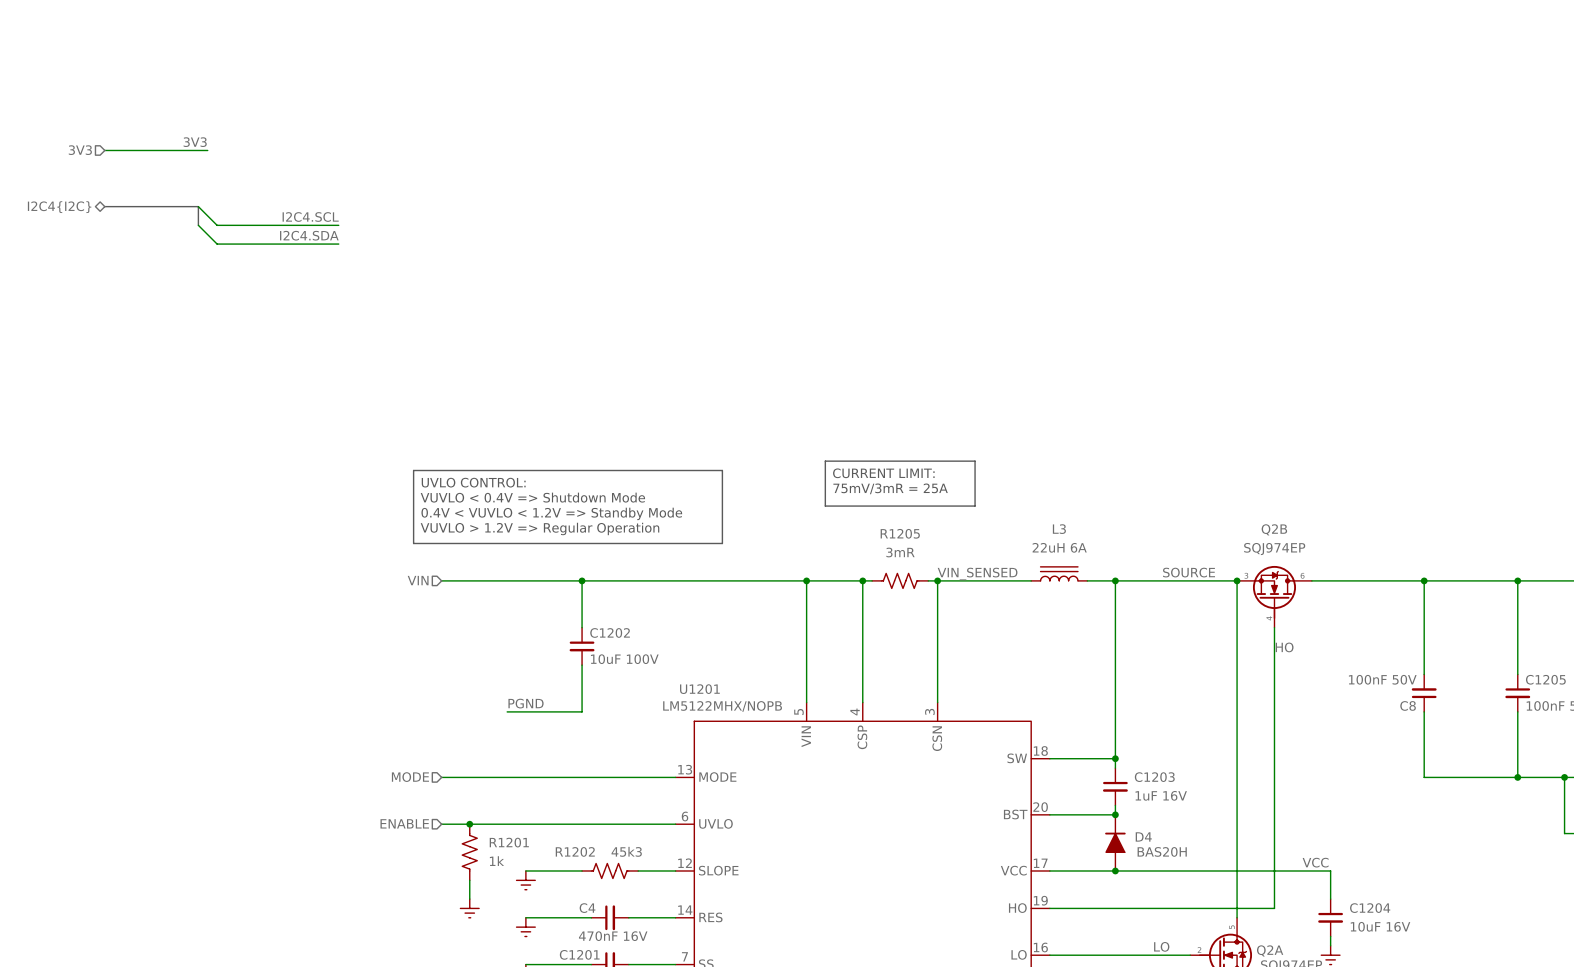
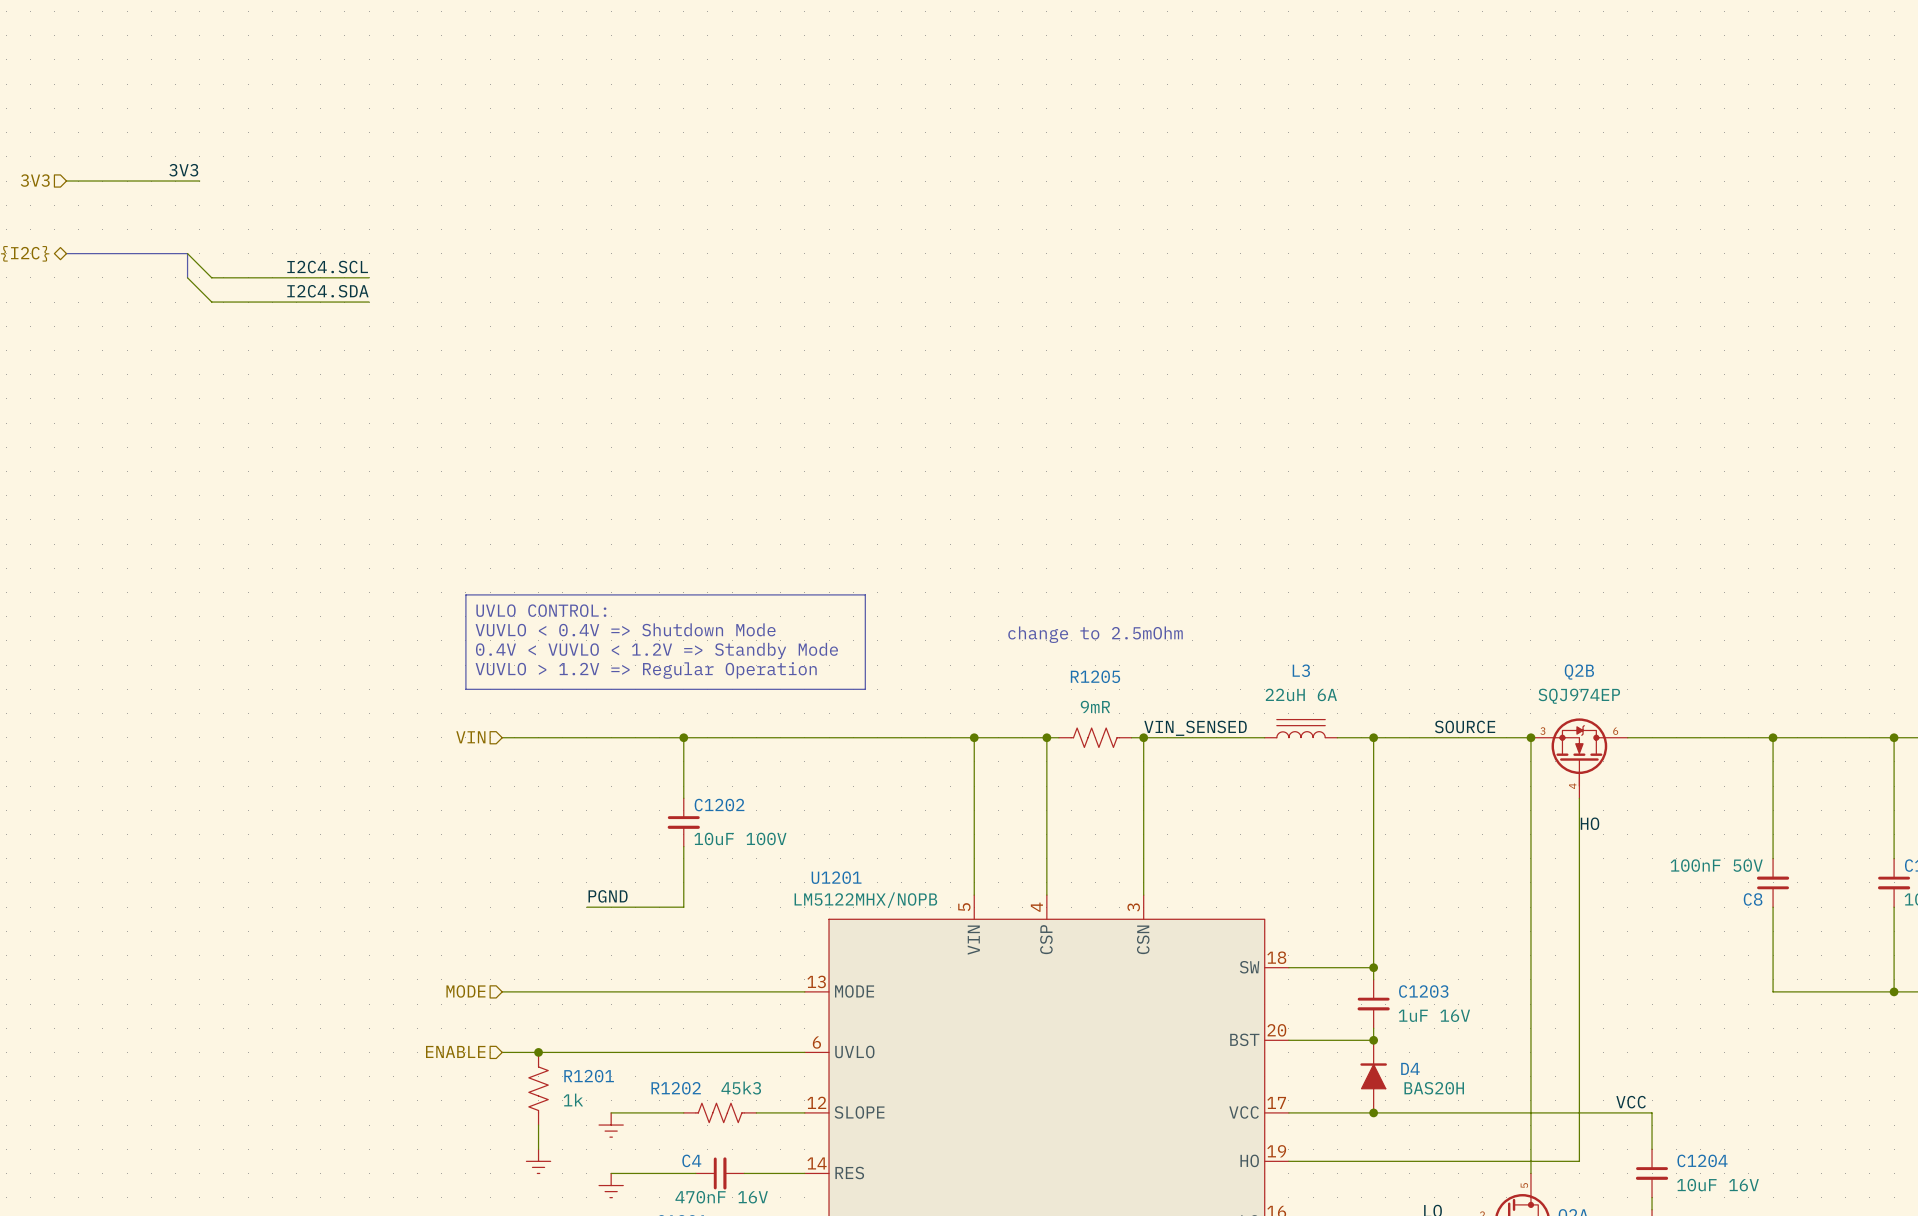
line: (825, 461) (975, 461) (975, 506) (825, 506) (825, 461) -> none
text: CURRENT LIMIT: (883, 473) -> none
text: 75mV/3mR = 25A (890, 488) -> none
text: none -> change to 2.5mOhm (1095, 634)
R1205 value: 3mR (900, 552) -> 9mR (1095, 706)

